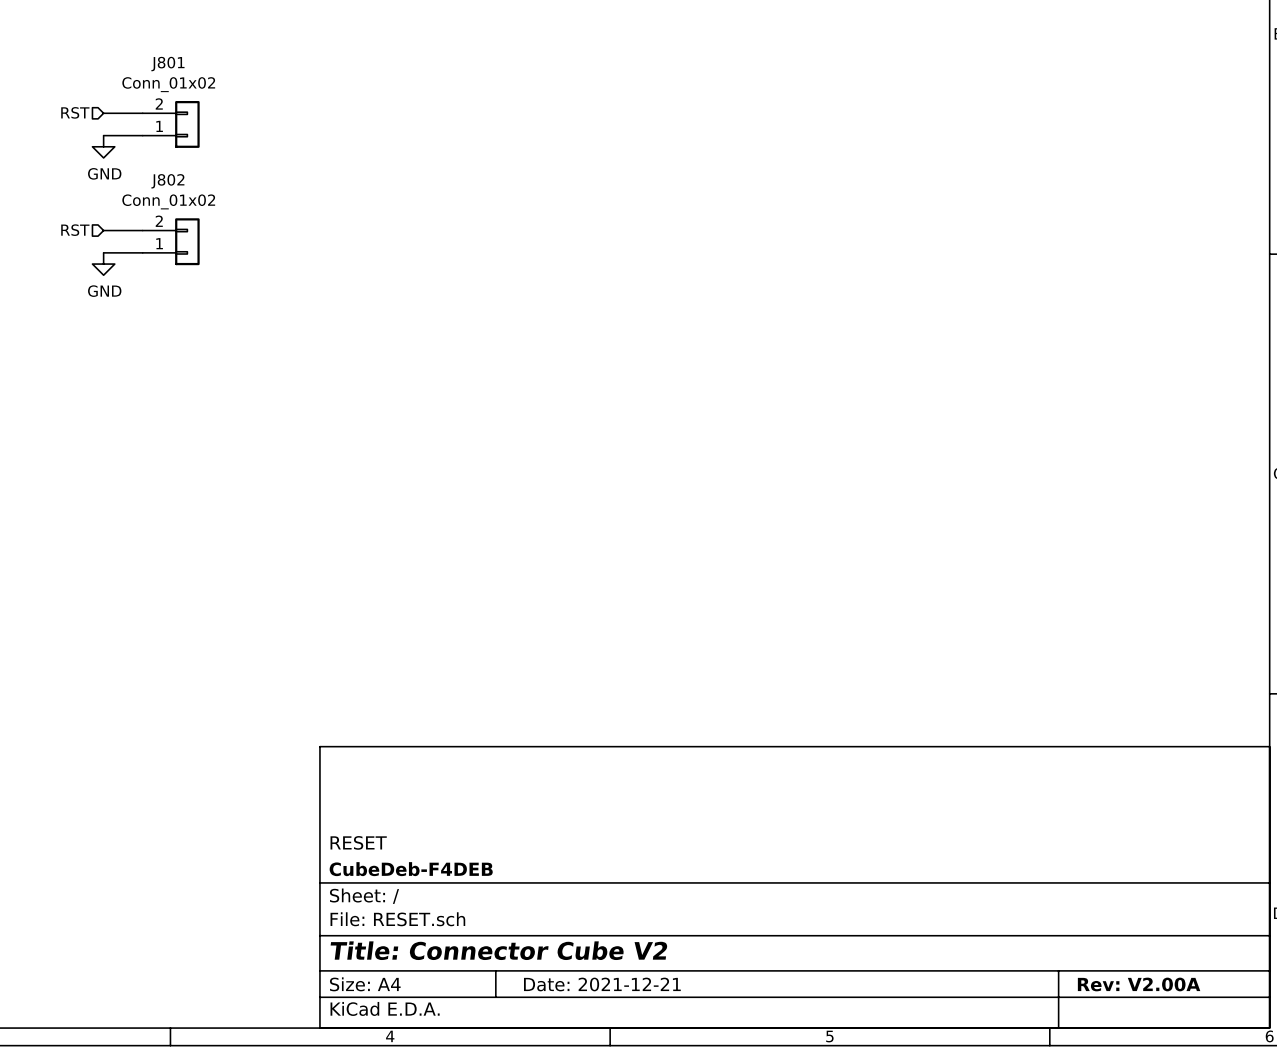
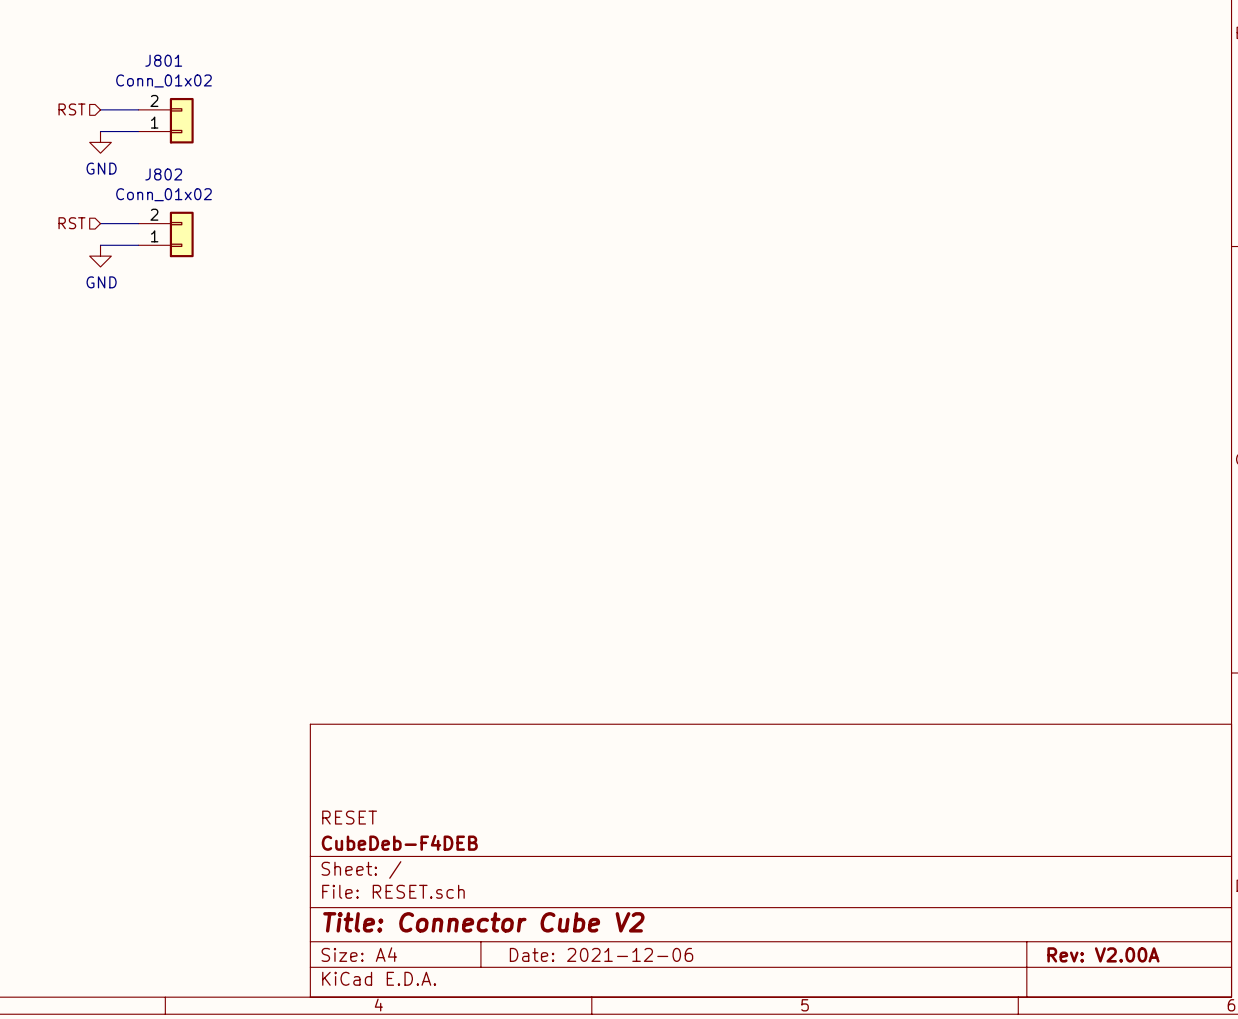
title block: Date: 2021-12-21 (602, 984) -> Date: 2021-12-06 (601, 954)

